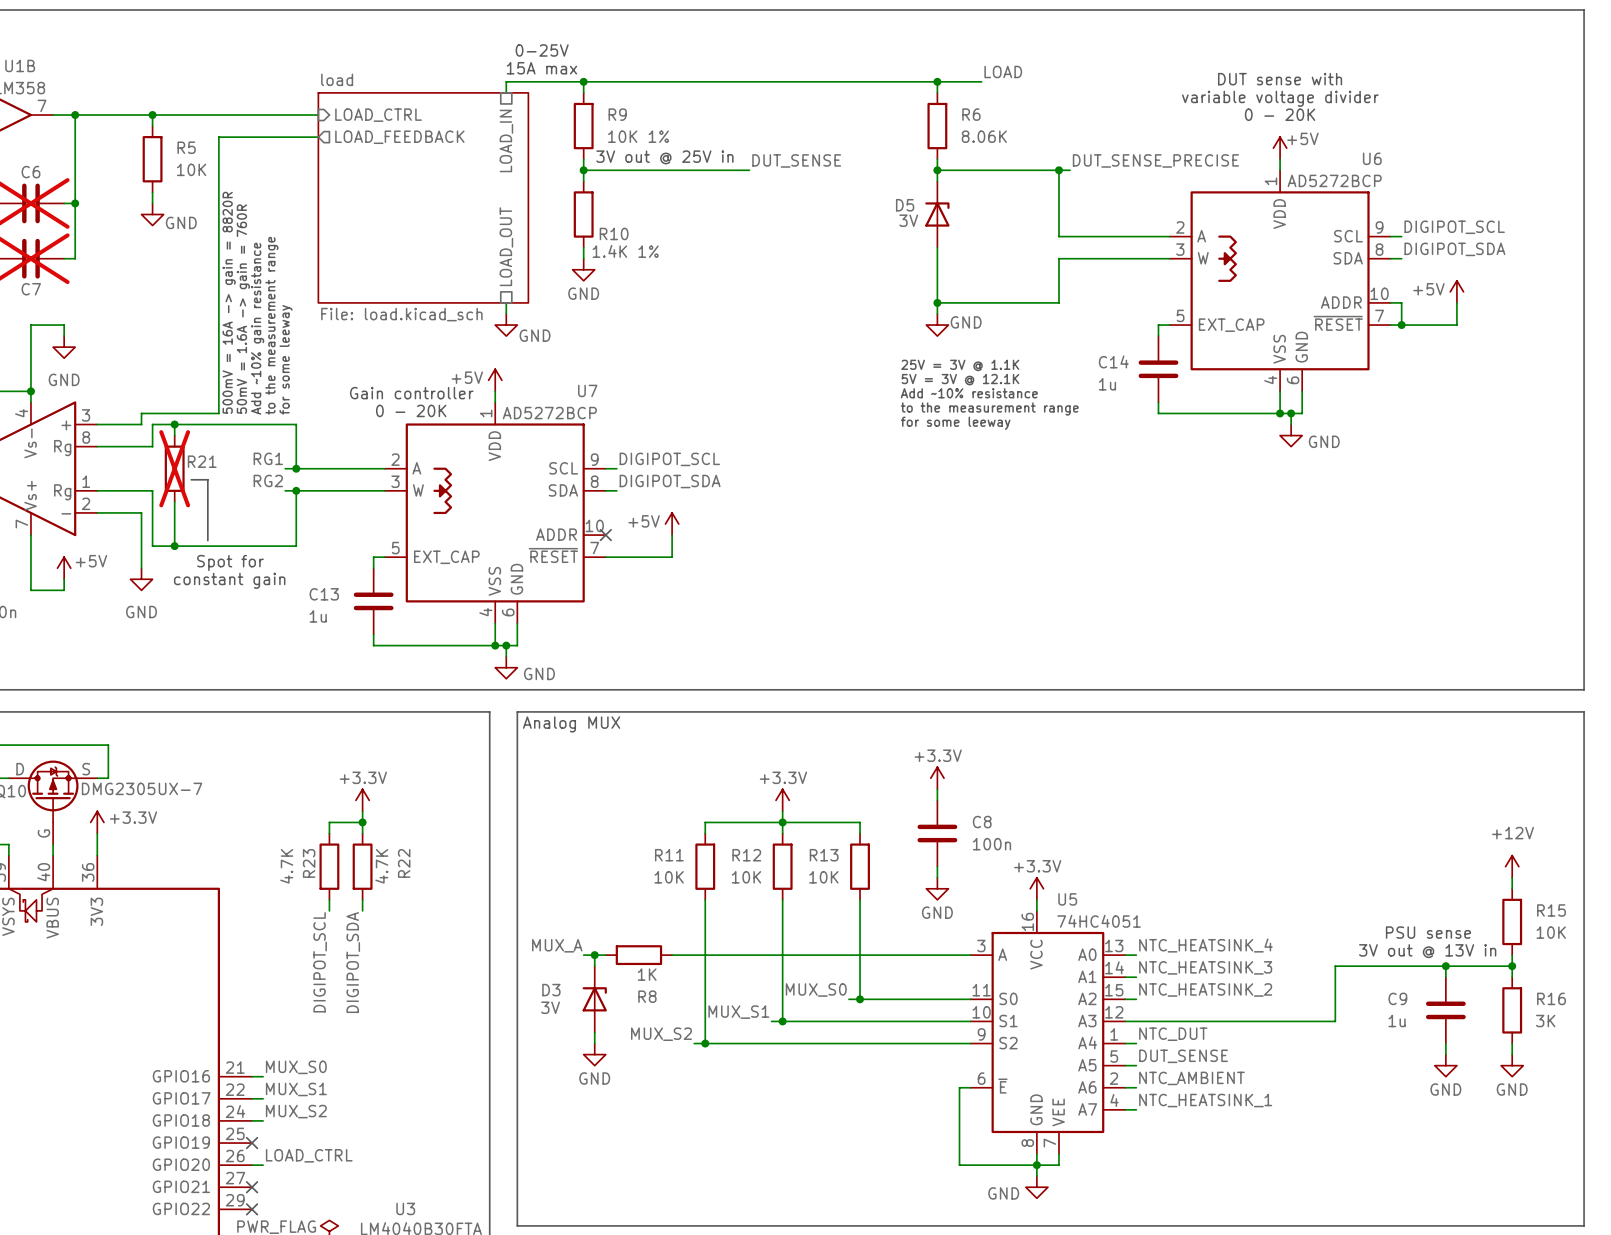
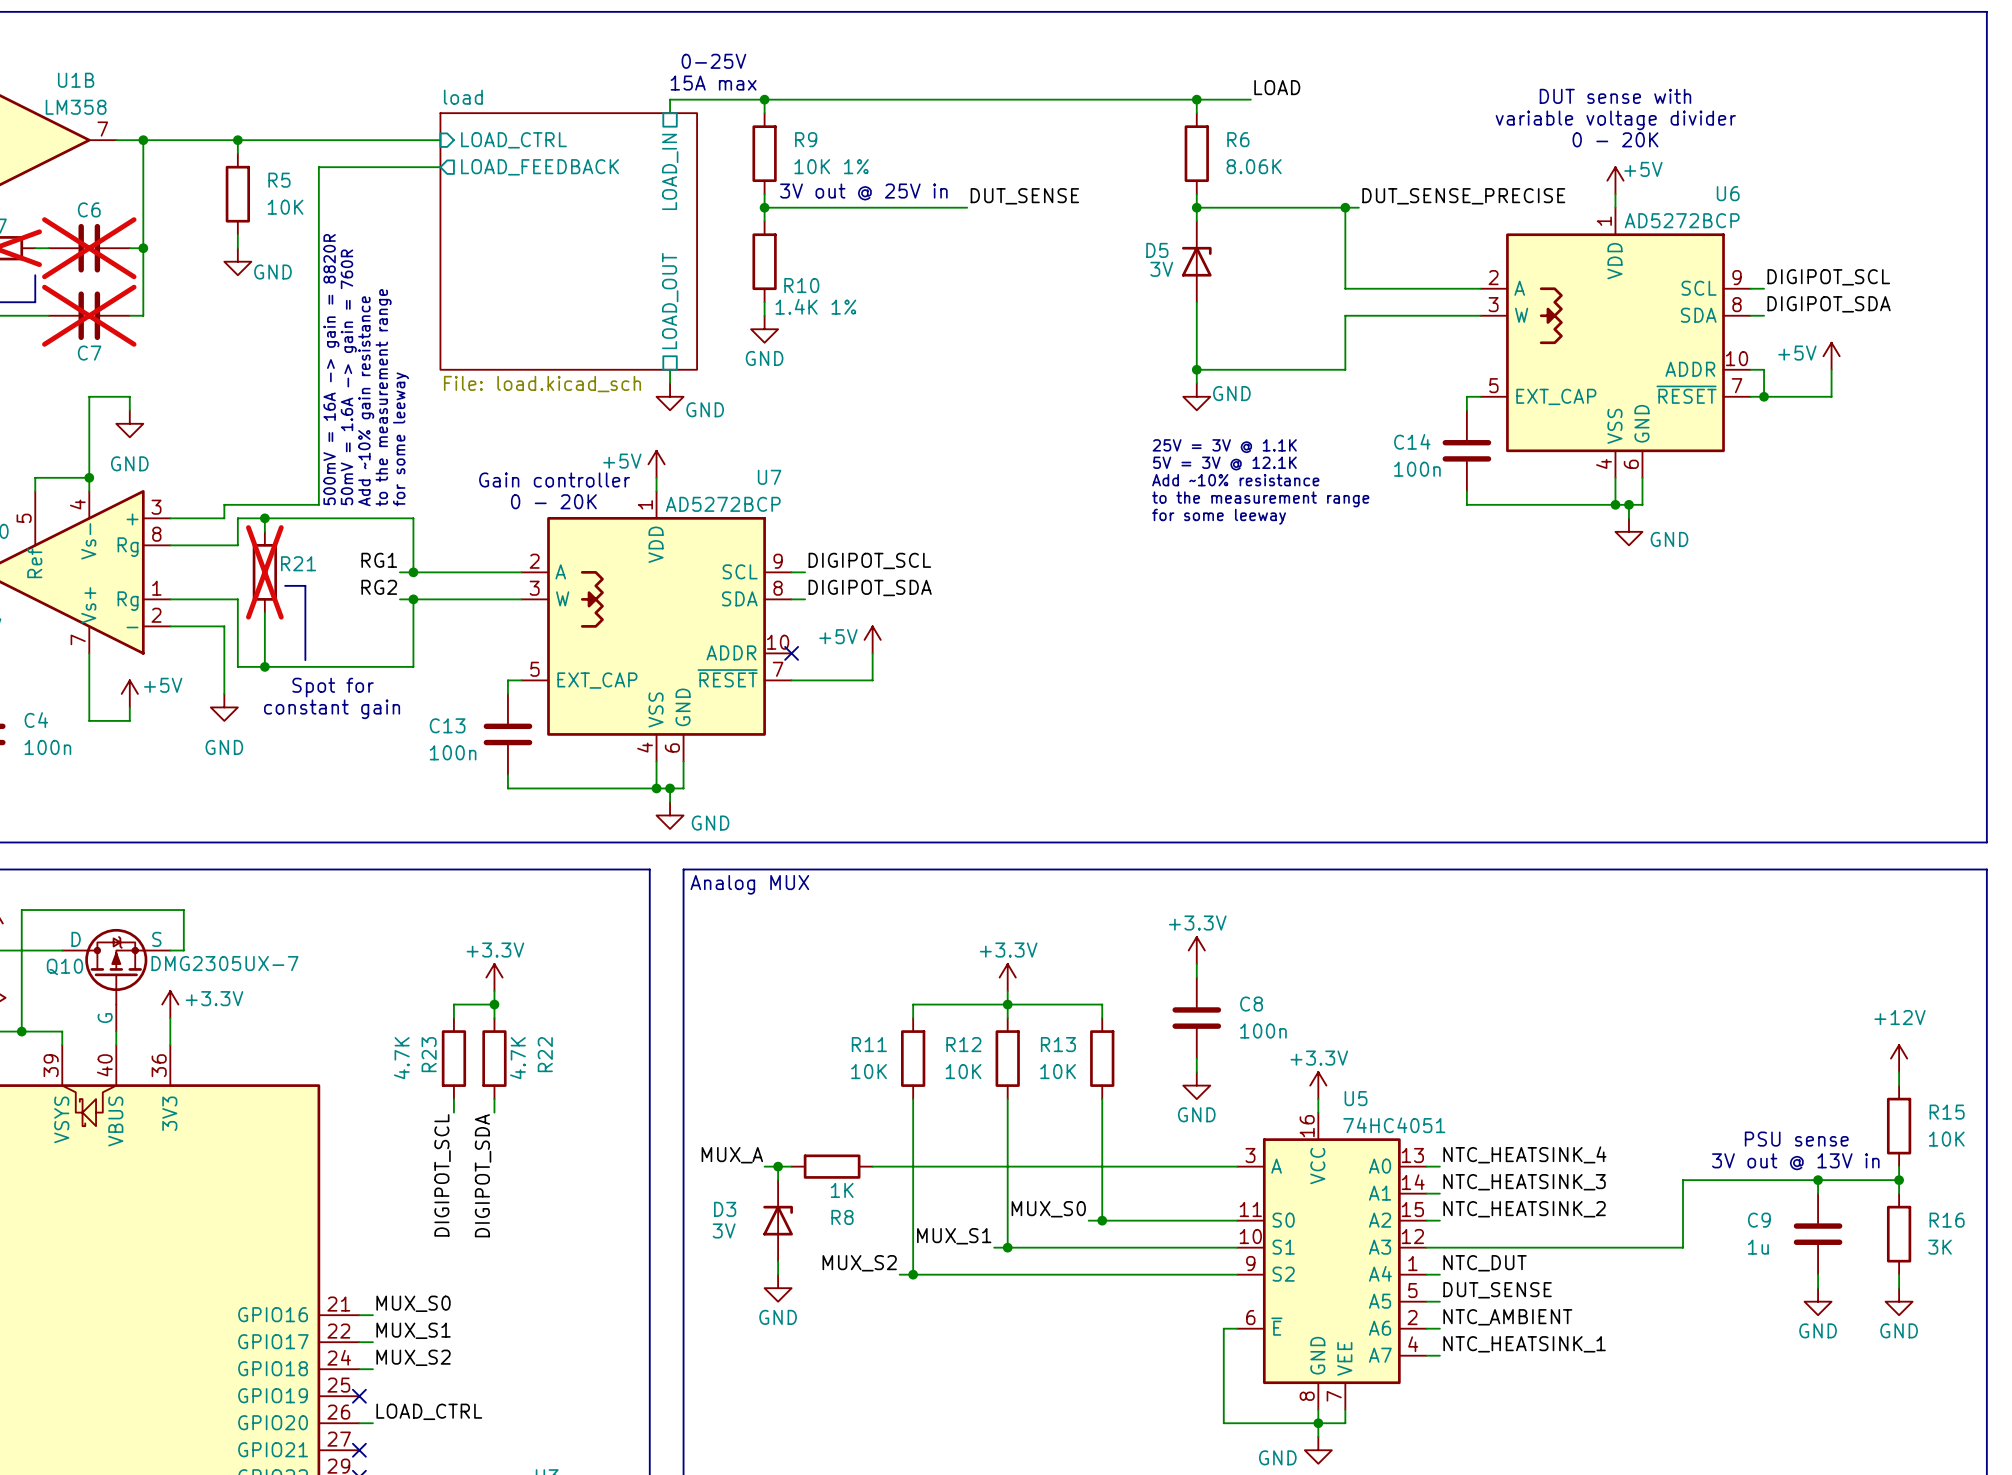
C14 value: 1u (1107, 384) -> 100n (1417, 469)
C13 value: 1u (318, 616) -> 100n (453, 752)

